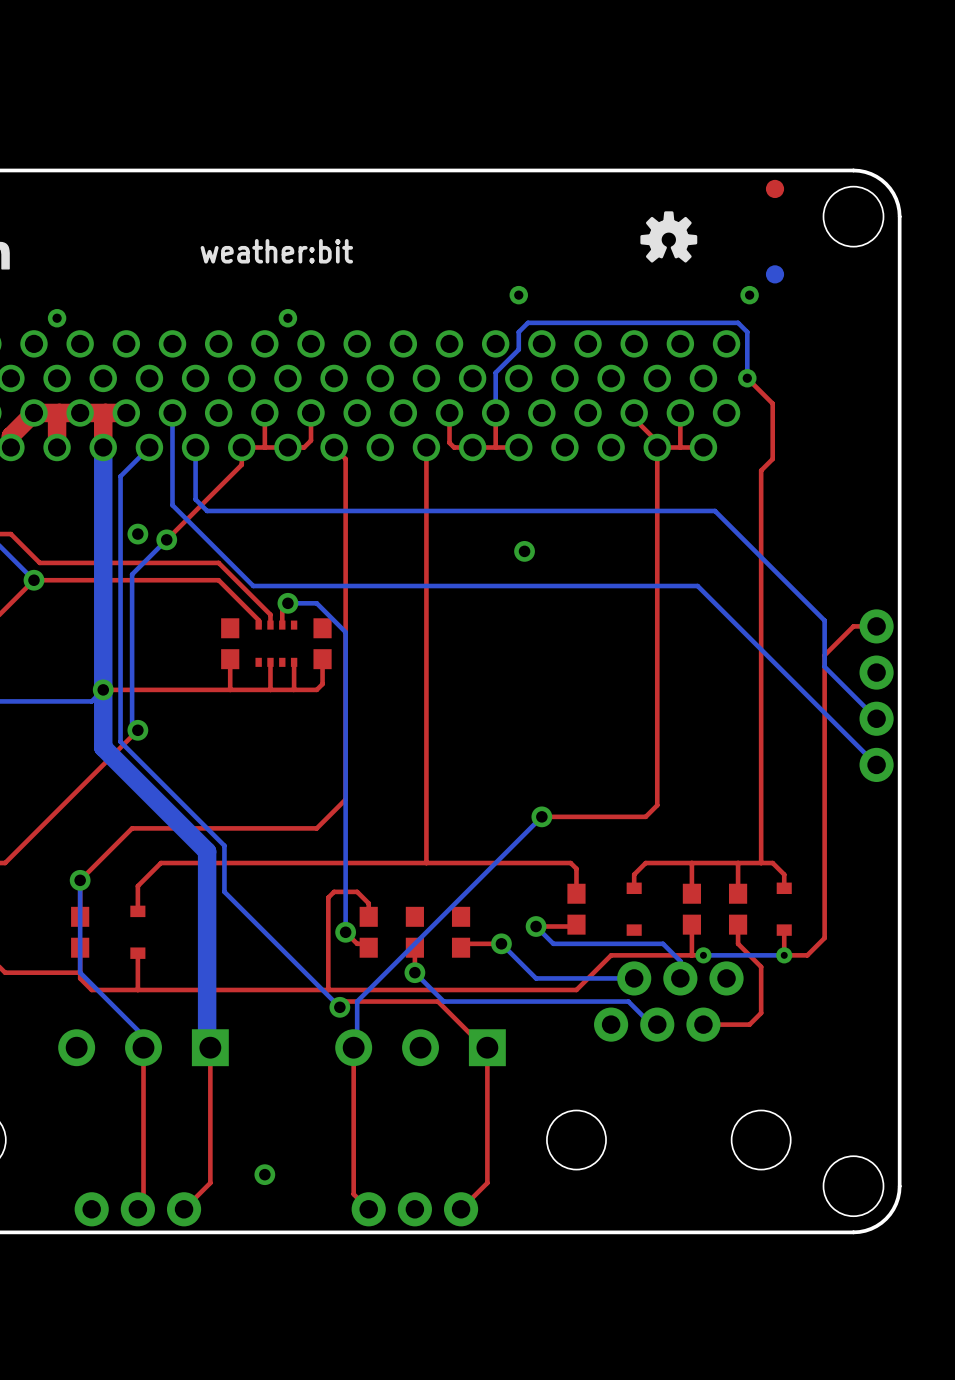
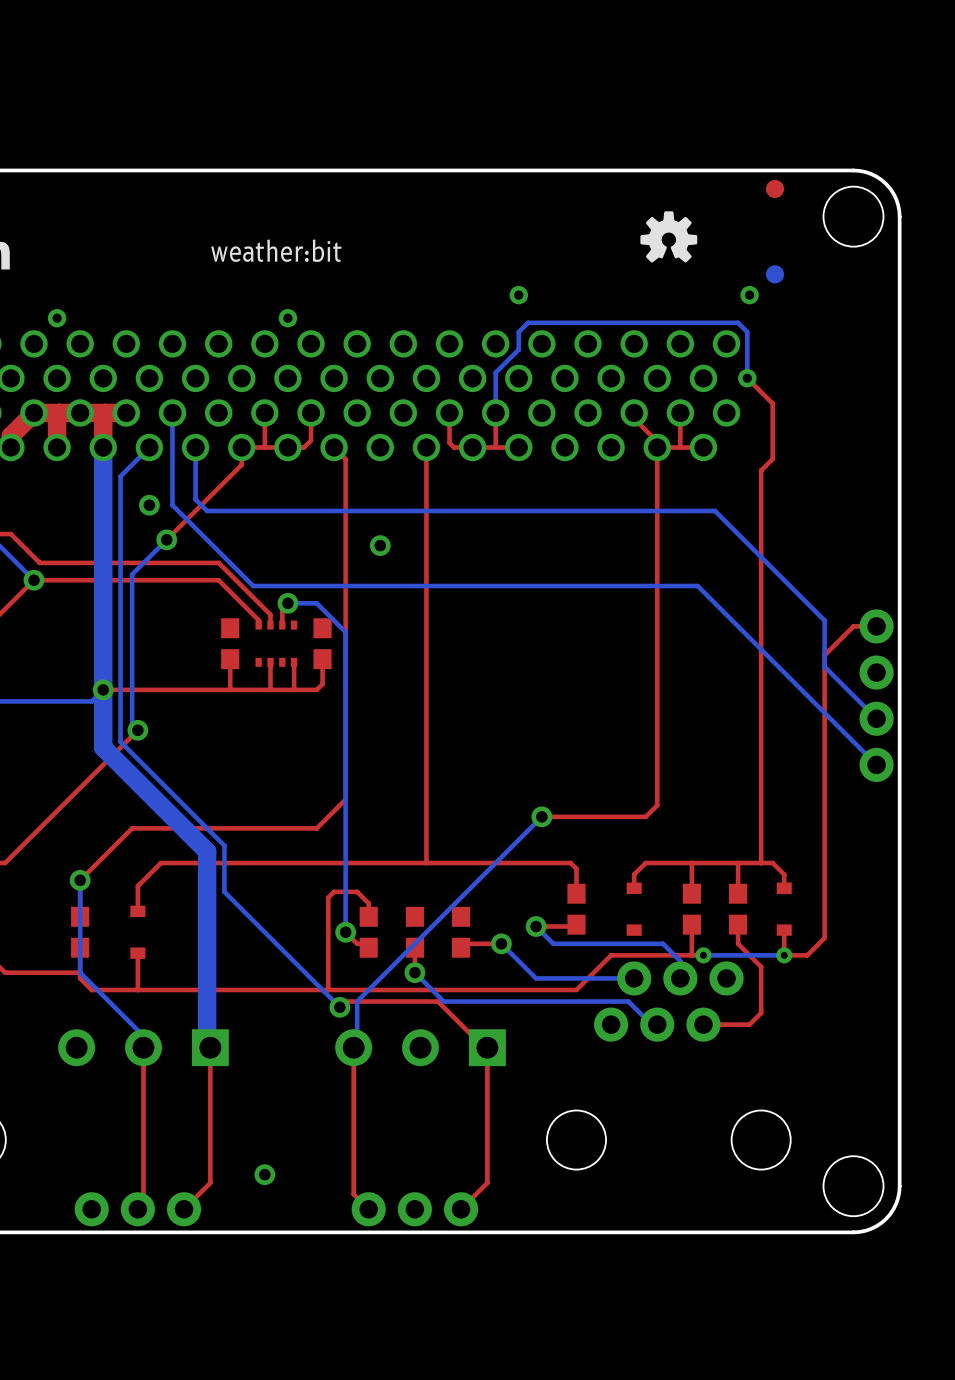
via position: (137, 534) -> (149, 505)
via: none -> (380, 545)
via: (524, 551) -> none

